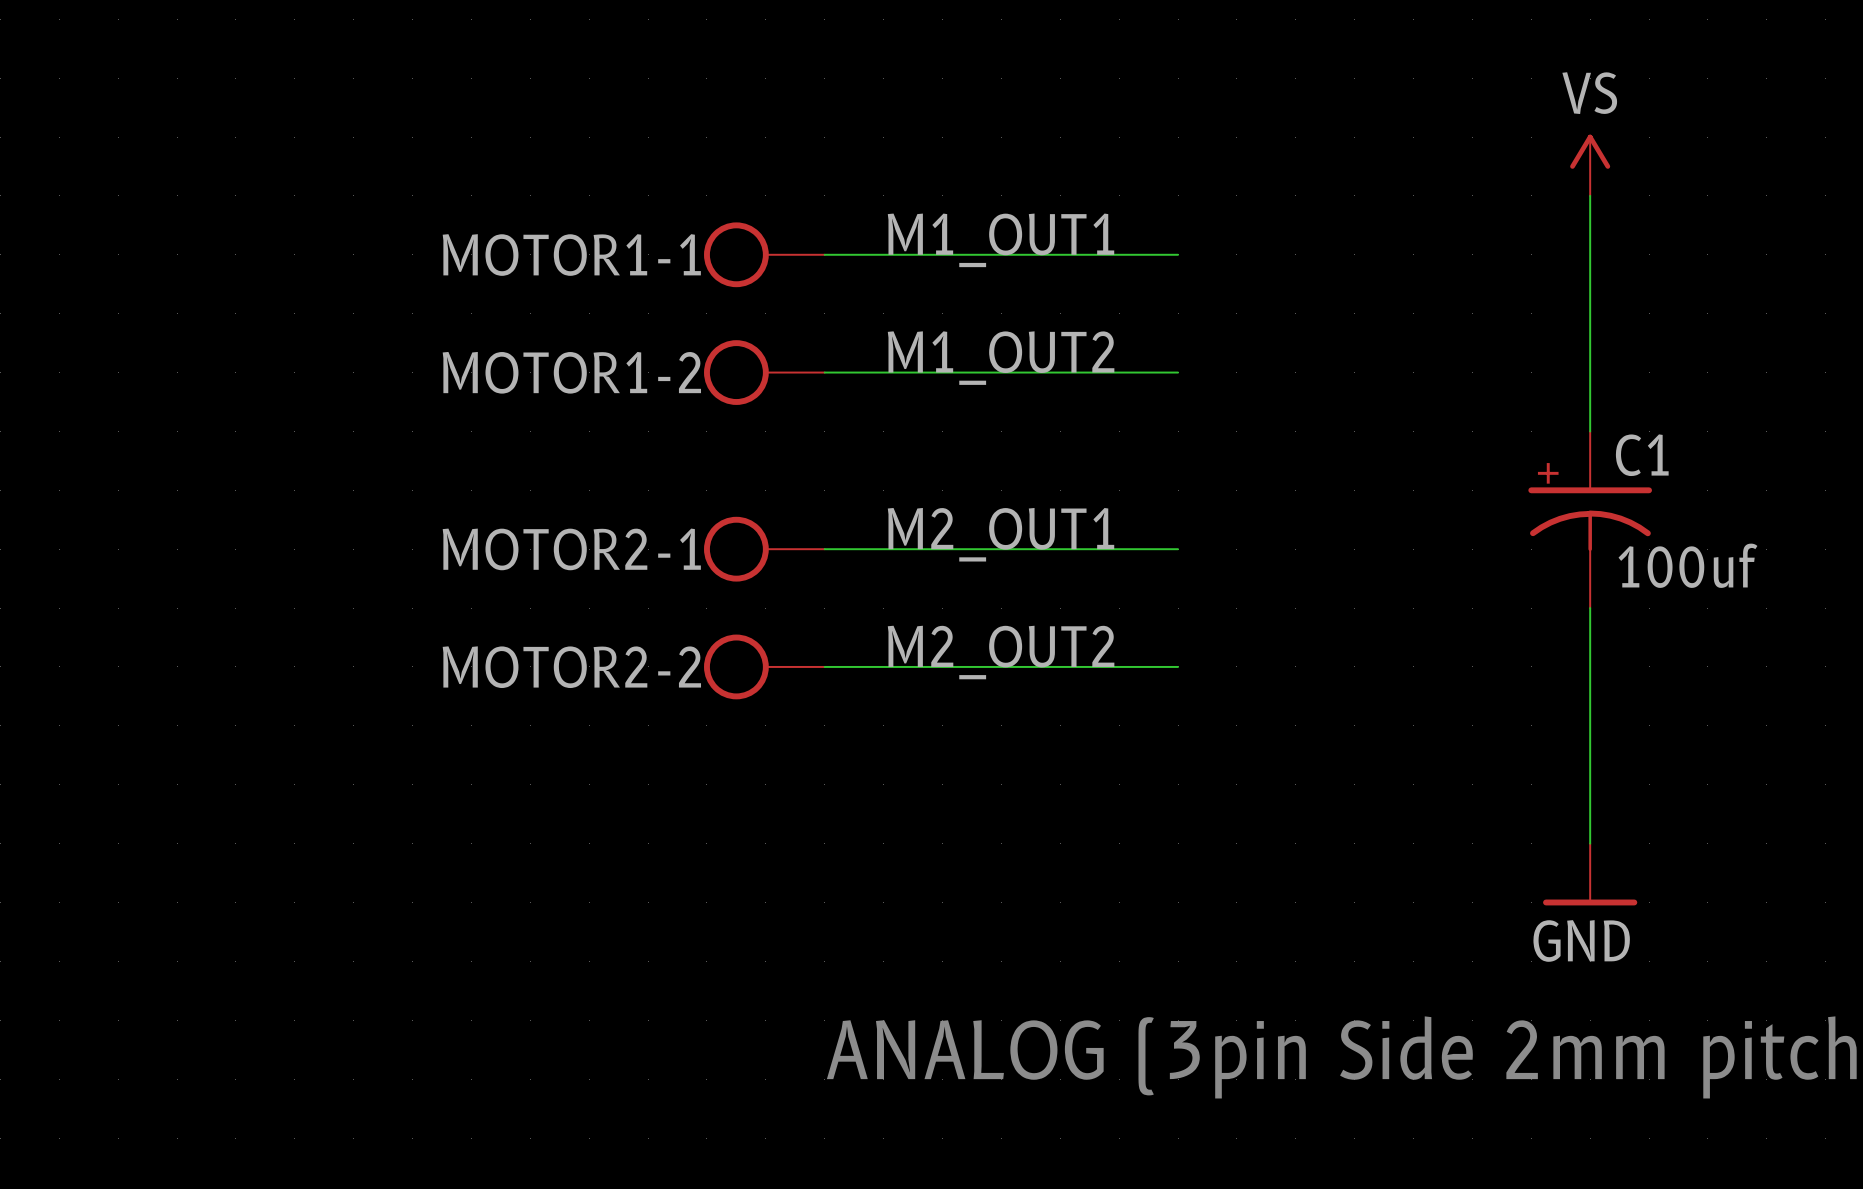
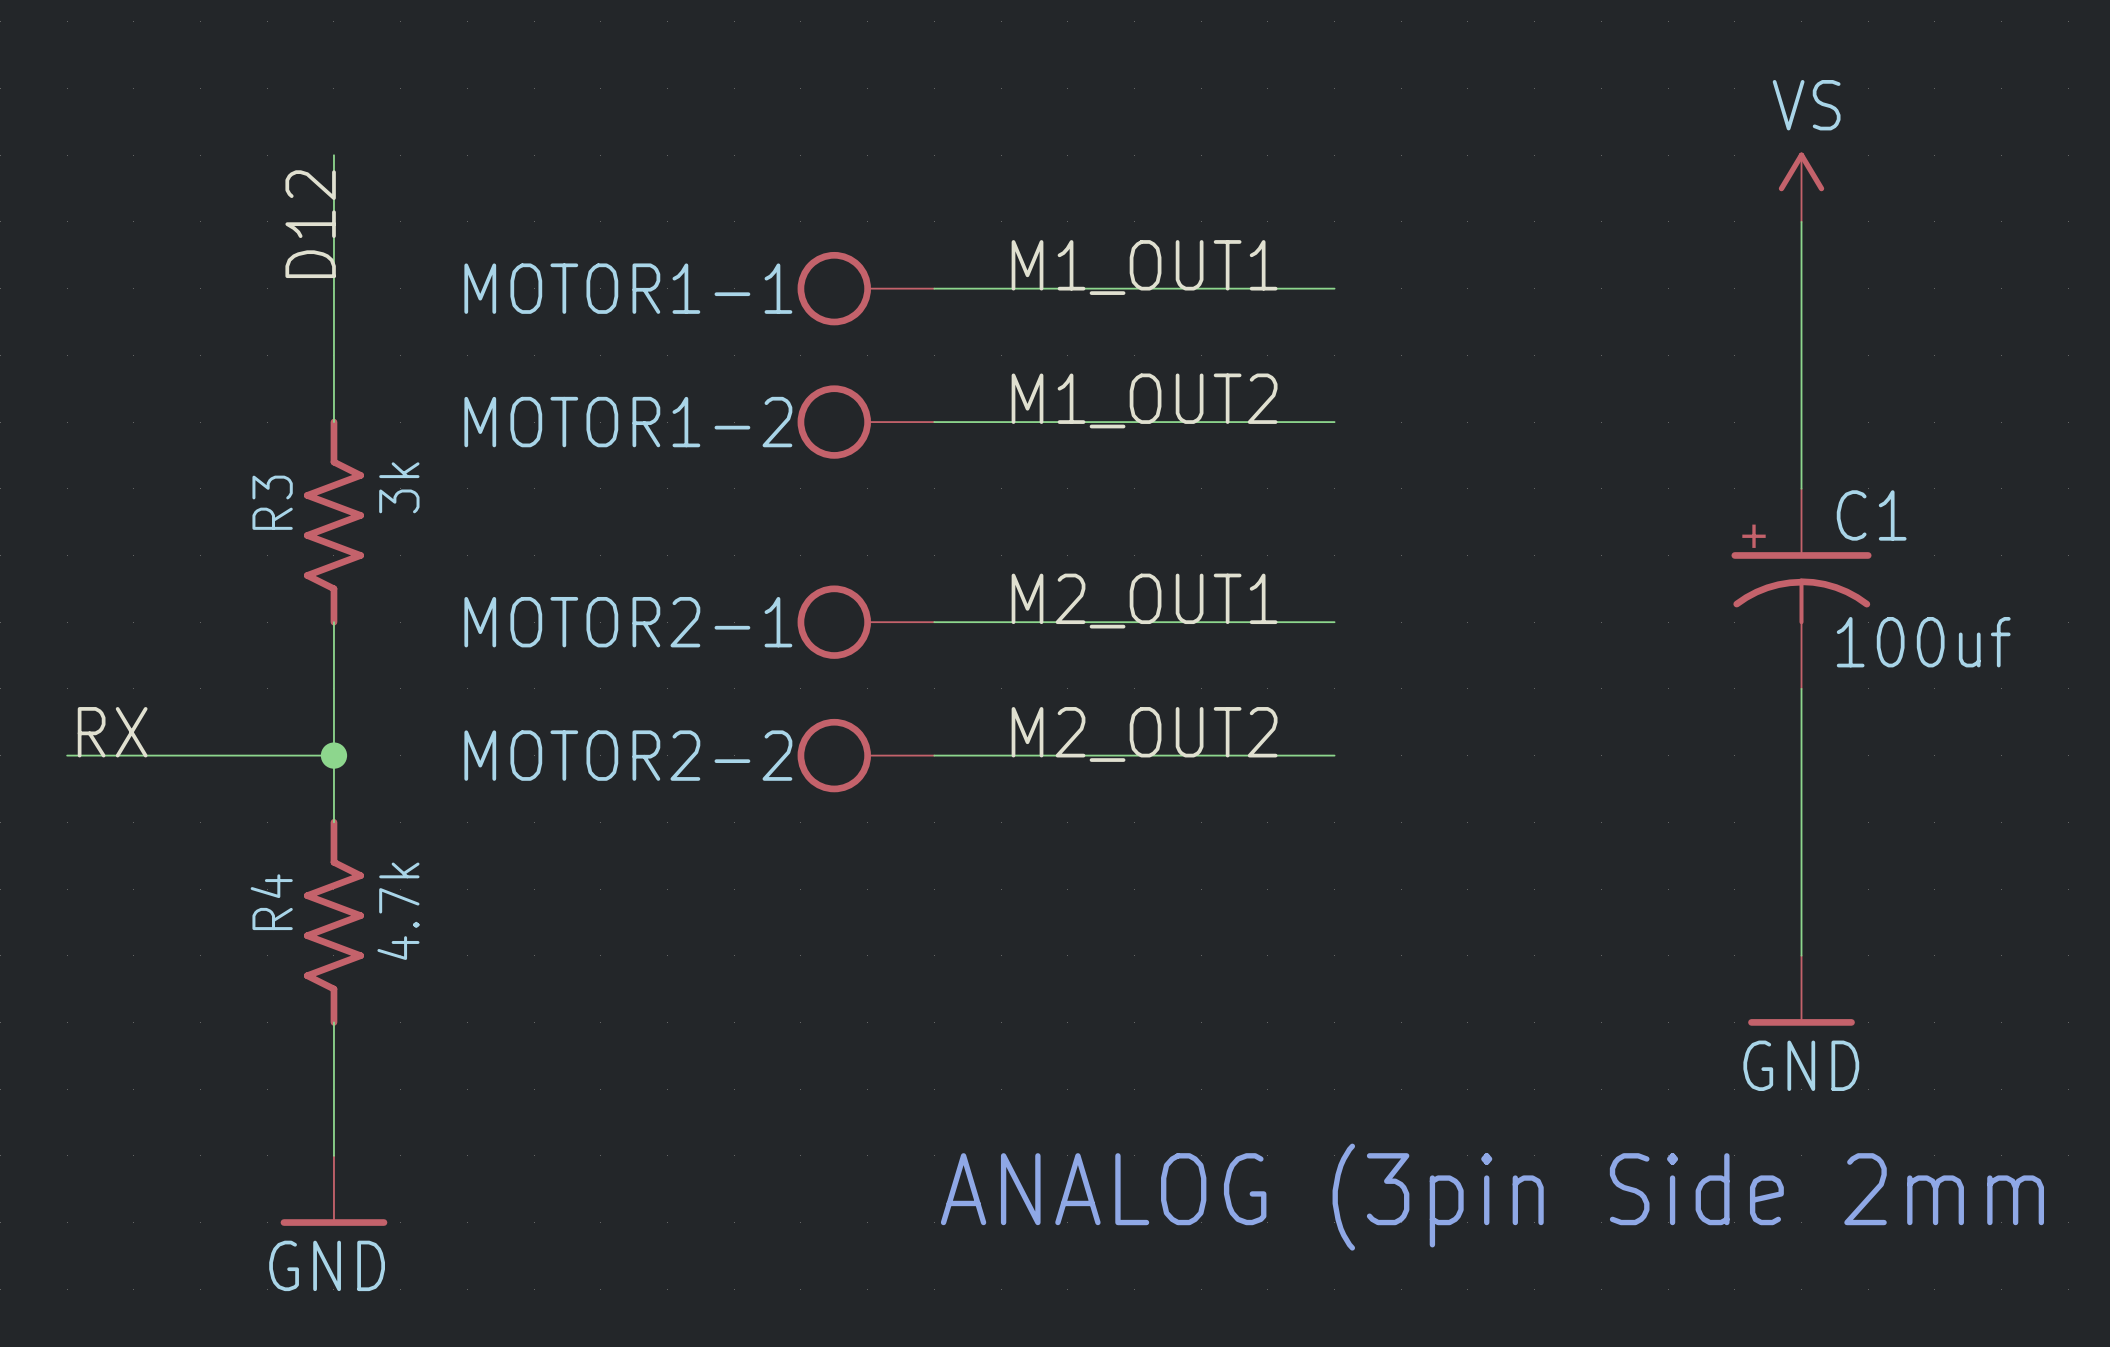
wire: none -> (333, 155) (333, 422)
label: none -> D12 (310, 224)
R3: none -> 3k (333, 522)
wire: none -> (333, 622) (333, 822)
label: none -> RX (112, 732)
wire: none -> (67, 755) (333, 755)
junction: none -> (333, 755)
R4: none -> 4.7k (333, 922)
wire: none -> (333, 1022) (333, 1155)
power symbol: none -> GND (333, 1190)

